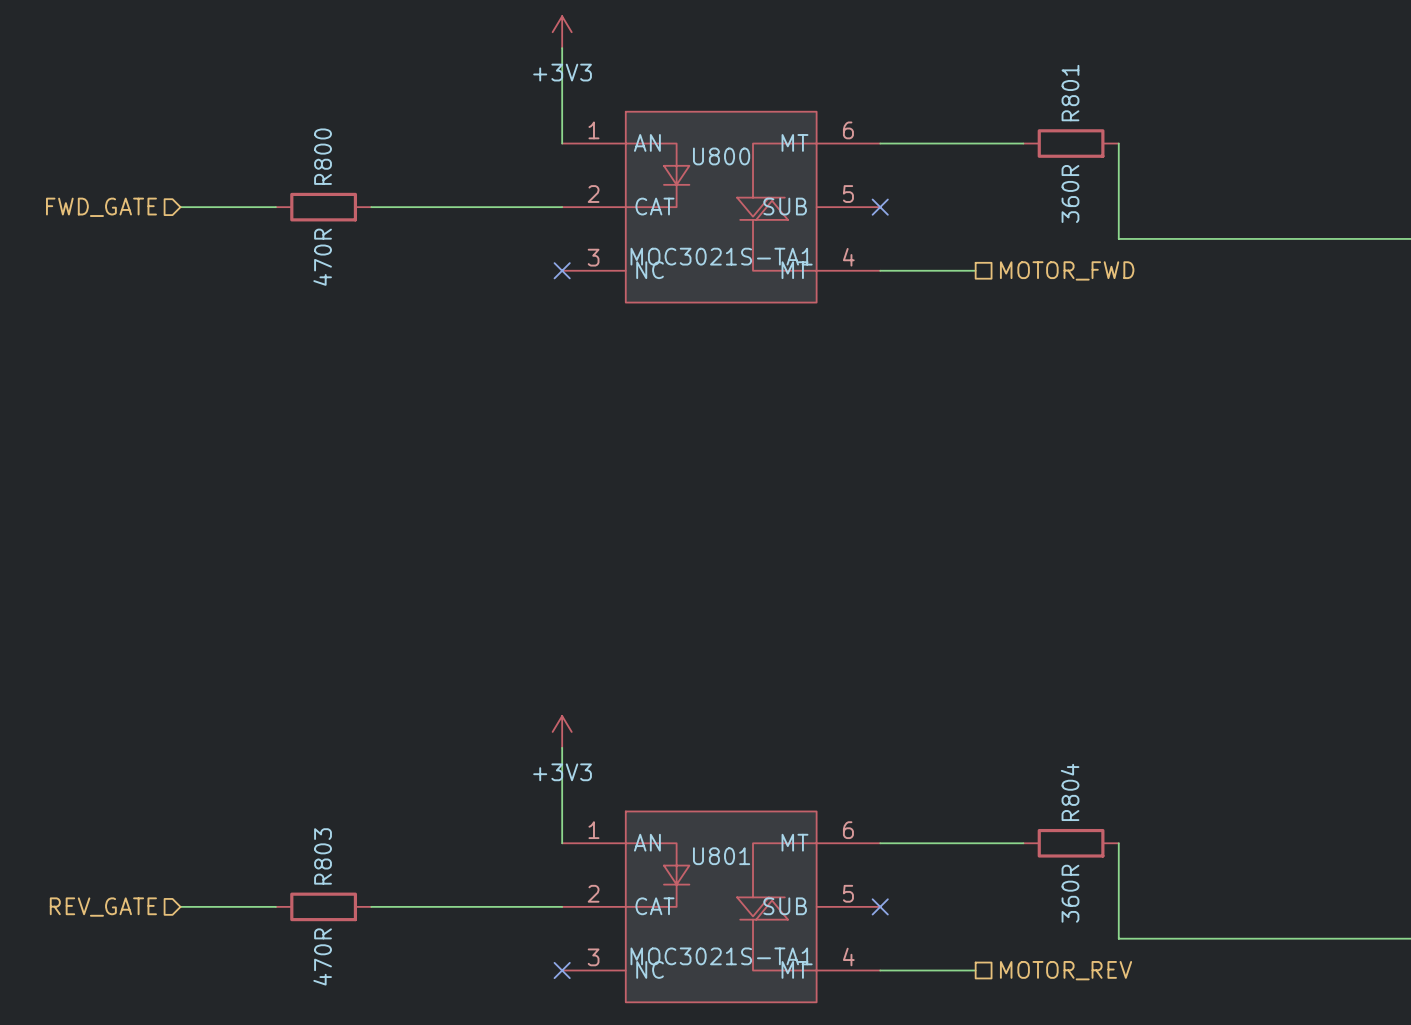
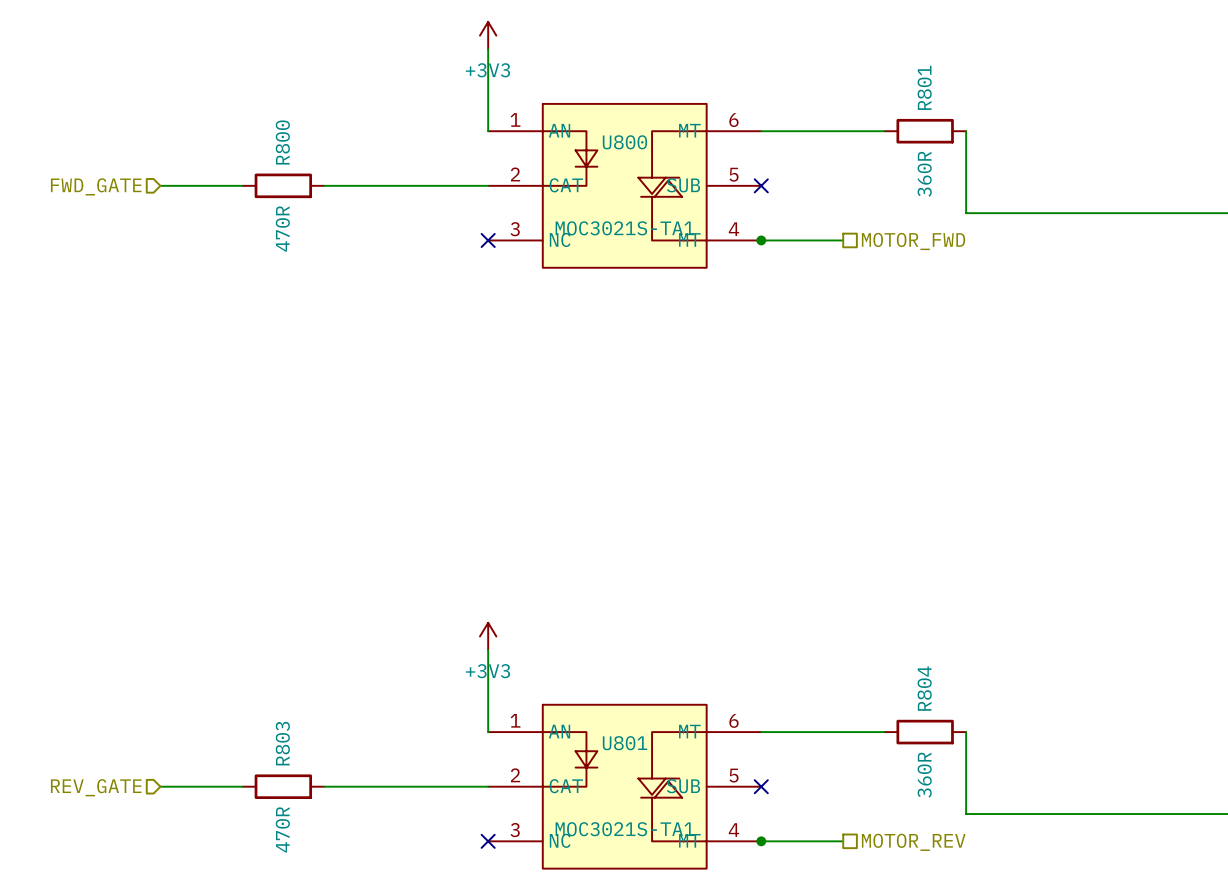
junction: none -> (761, 240)
junction: none -> (761, 841)

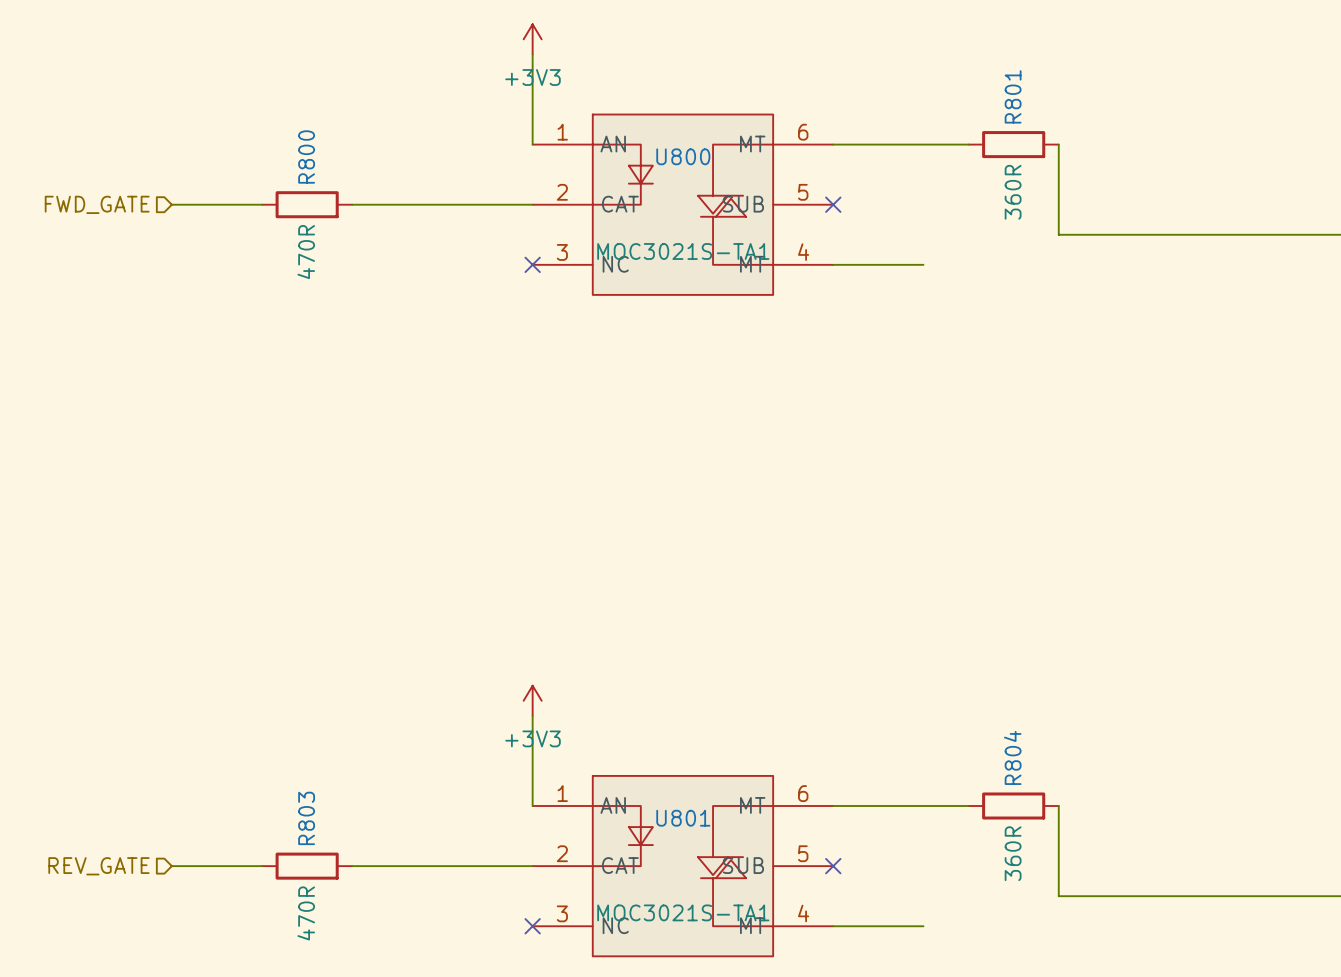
junction: (761, 240) -> none
hierarchical label: MOTOR_FWD (913, 241) -> none
junction: (761, 841) -> none
hierarchical label: MOTOR_REV (913, 842) -> none

